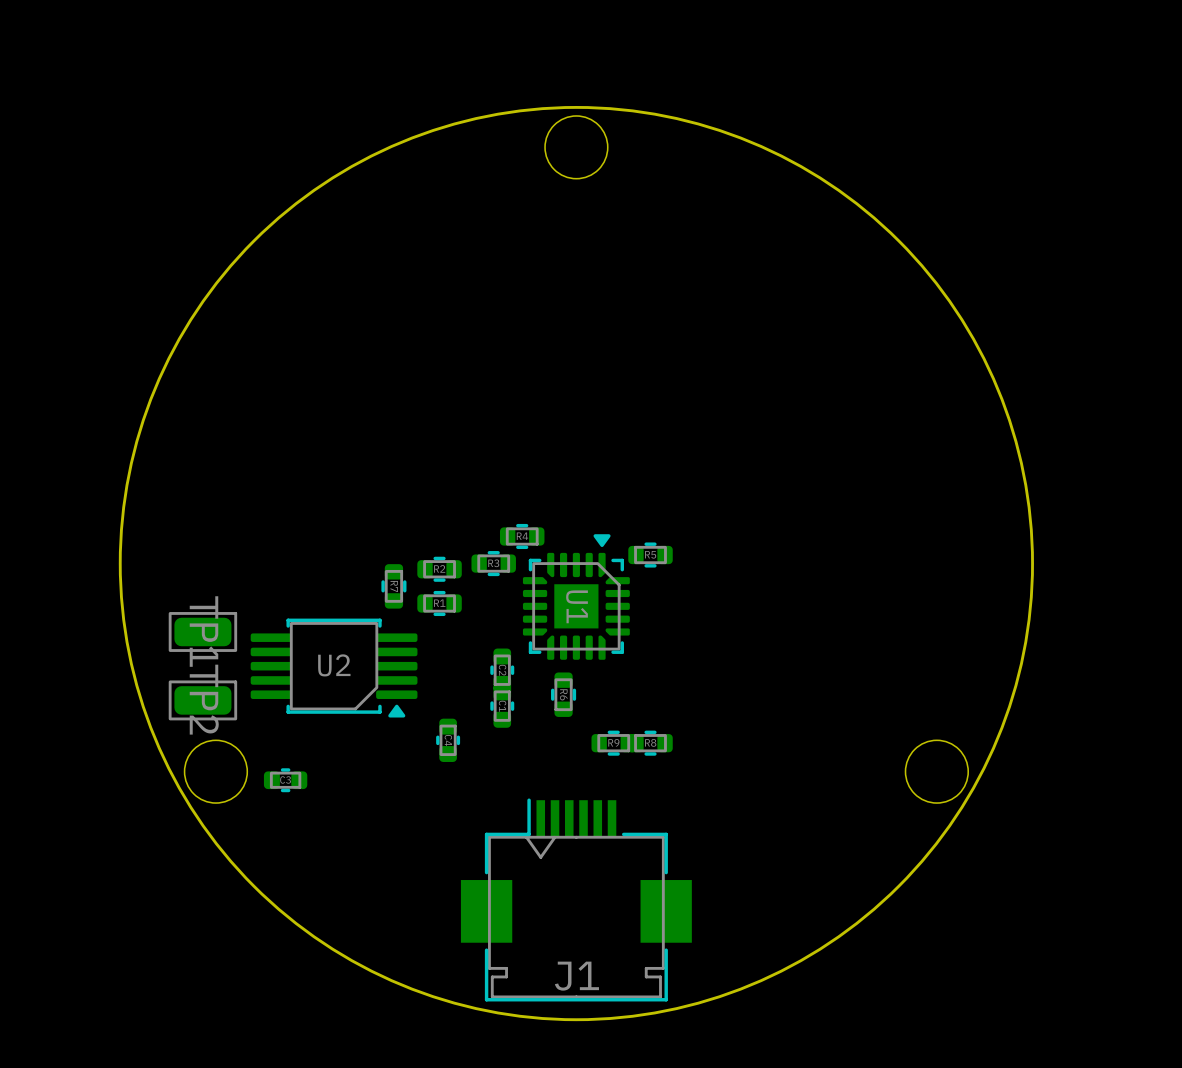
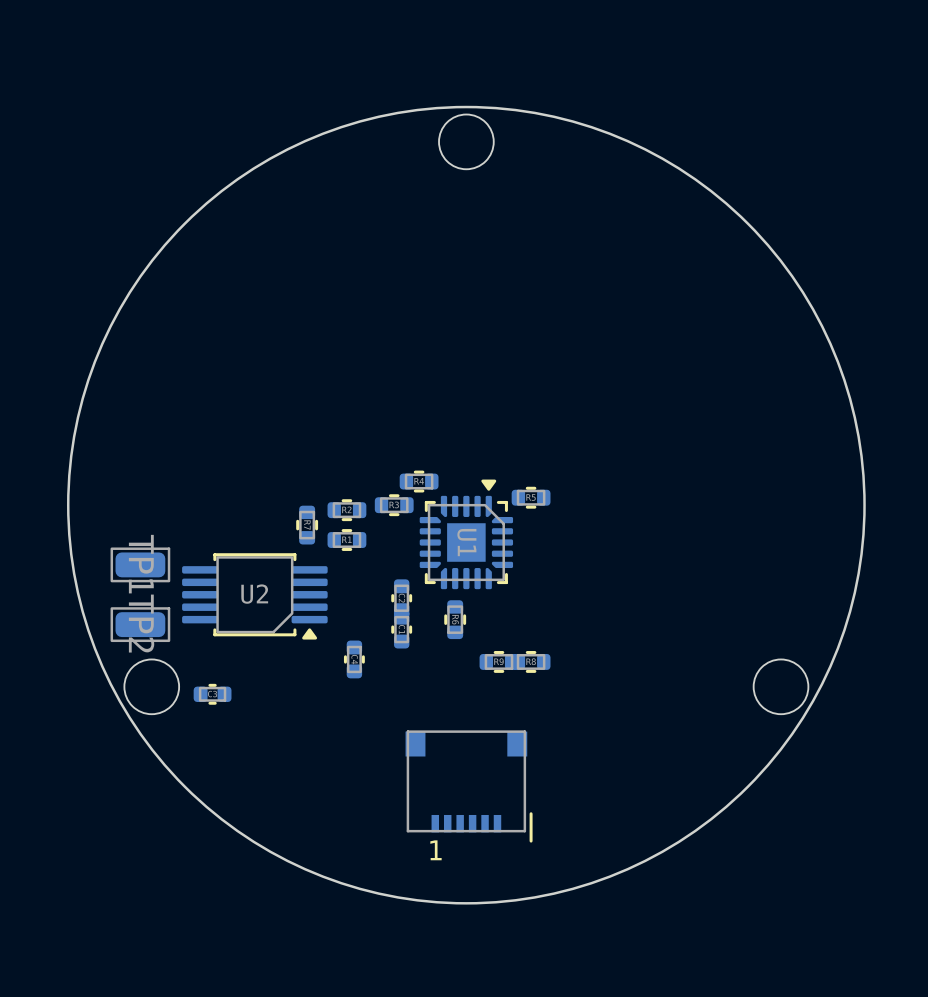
part: none -> (469, 786)
J1: (576, 899) -> none

